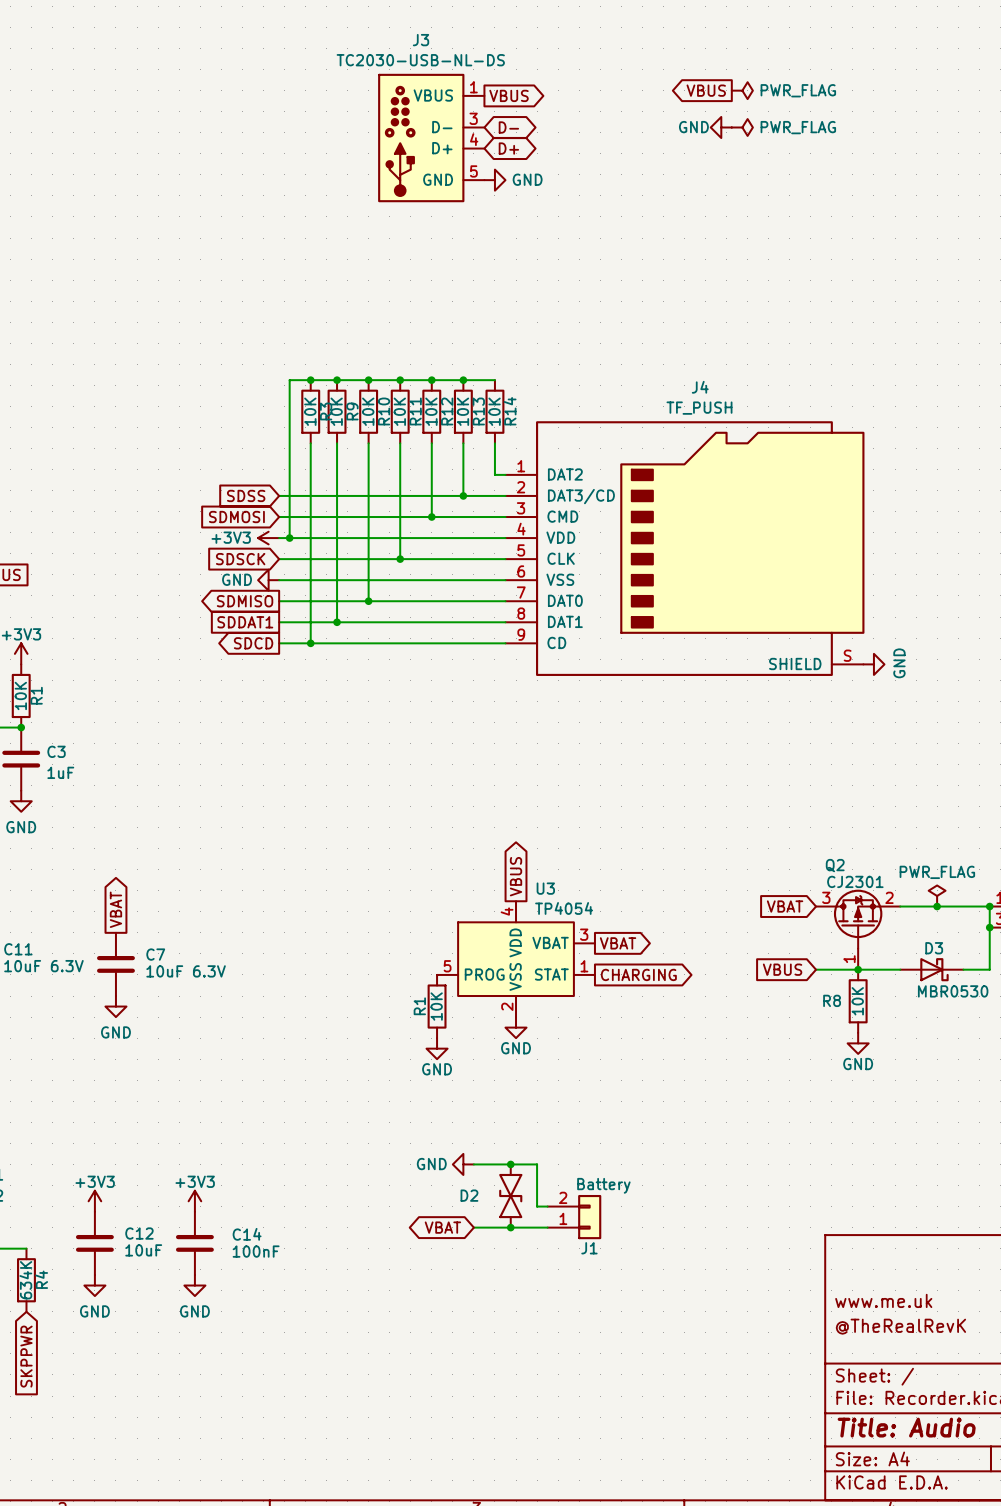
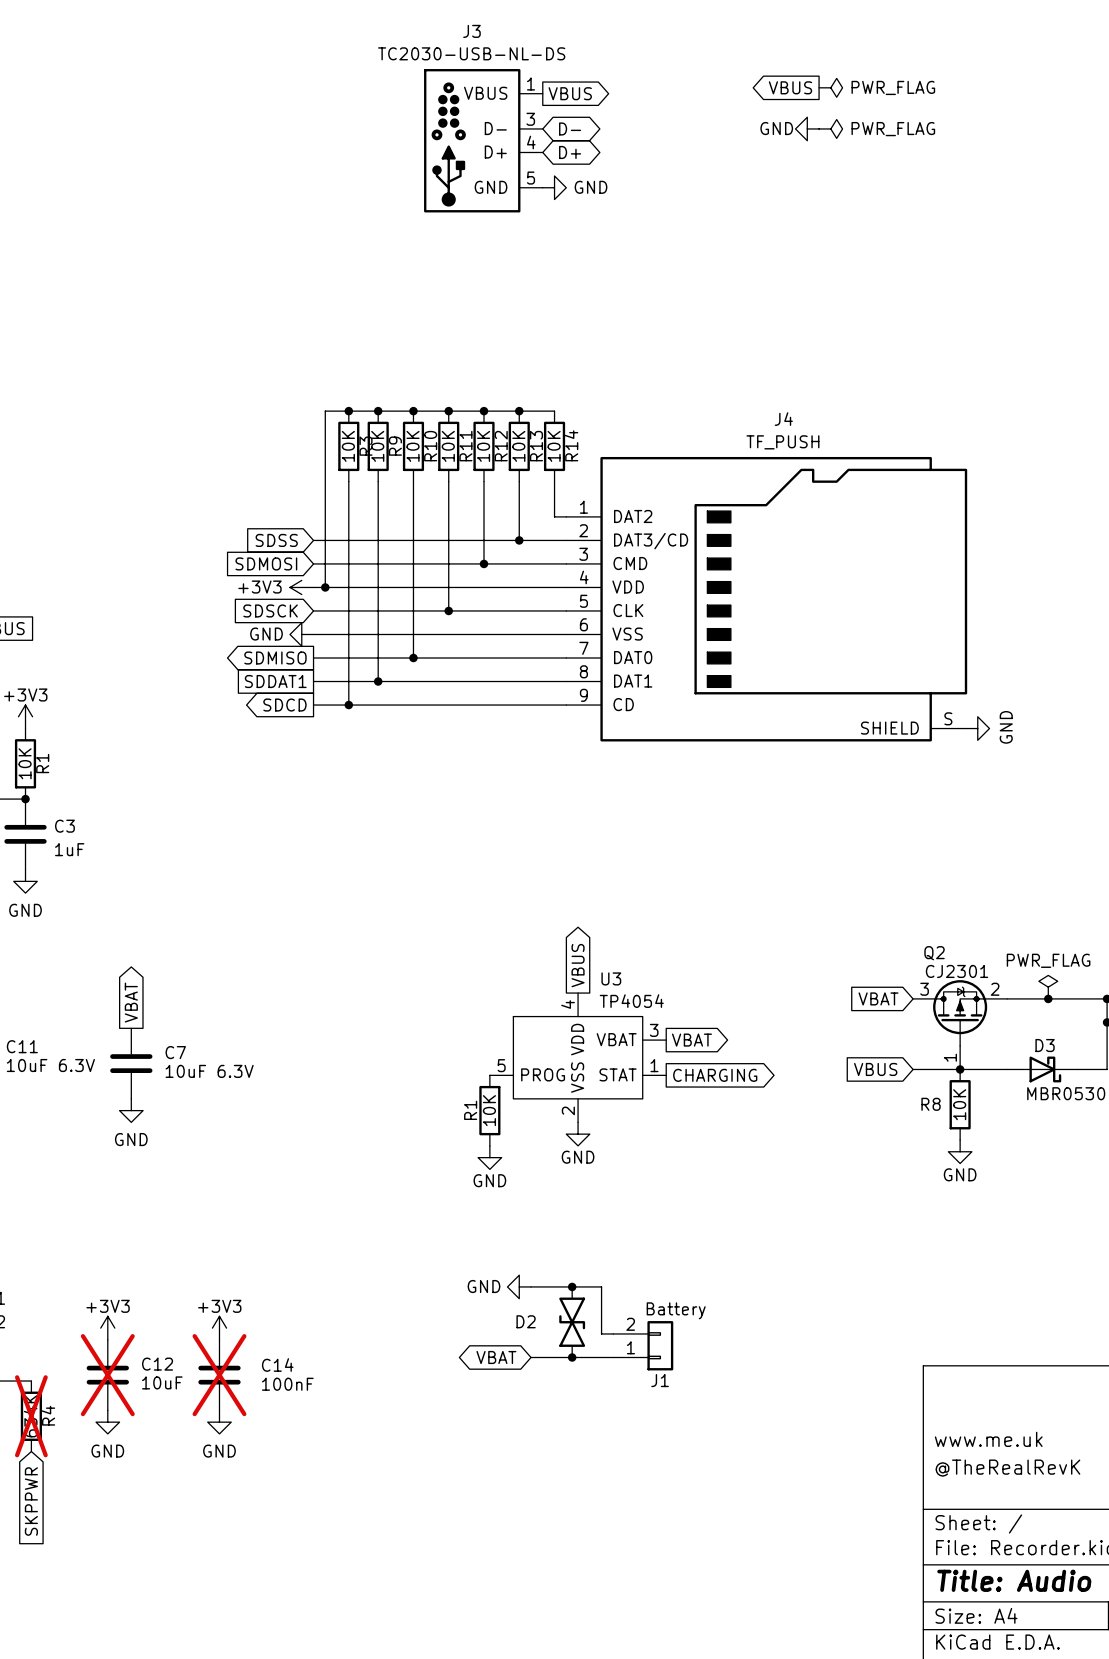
C12 do-not-place cross: none -> (107, 1375)
C14 do-not-place cross: none -> (219, 1375)
R4 do-not-place cross: none -> (31, 1416)

